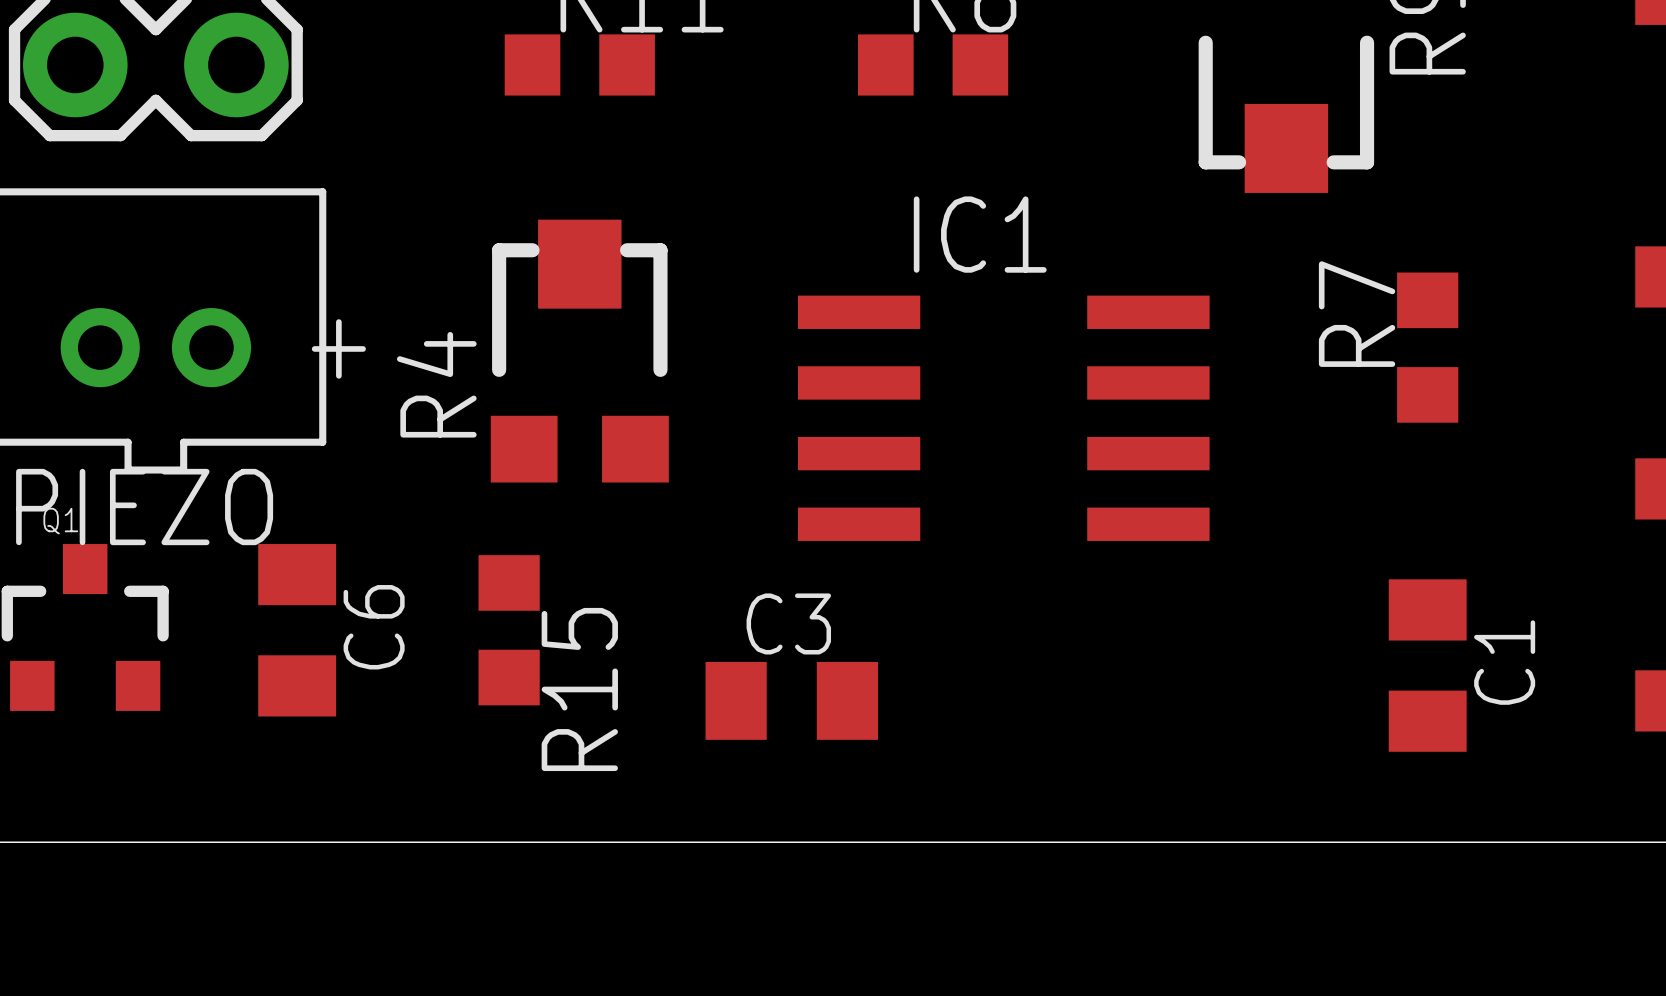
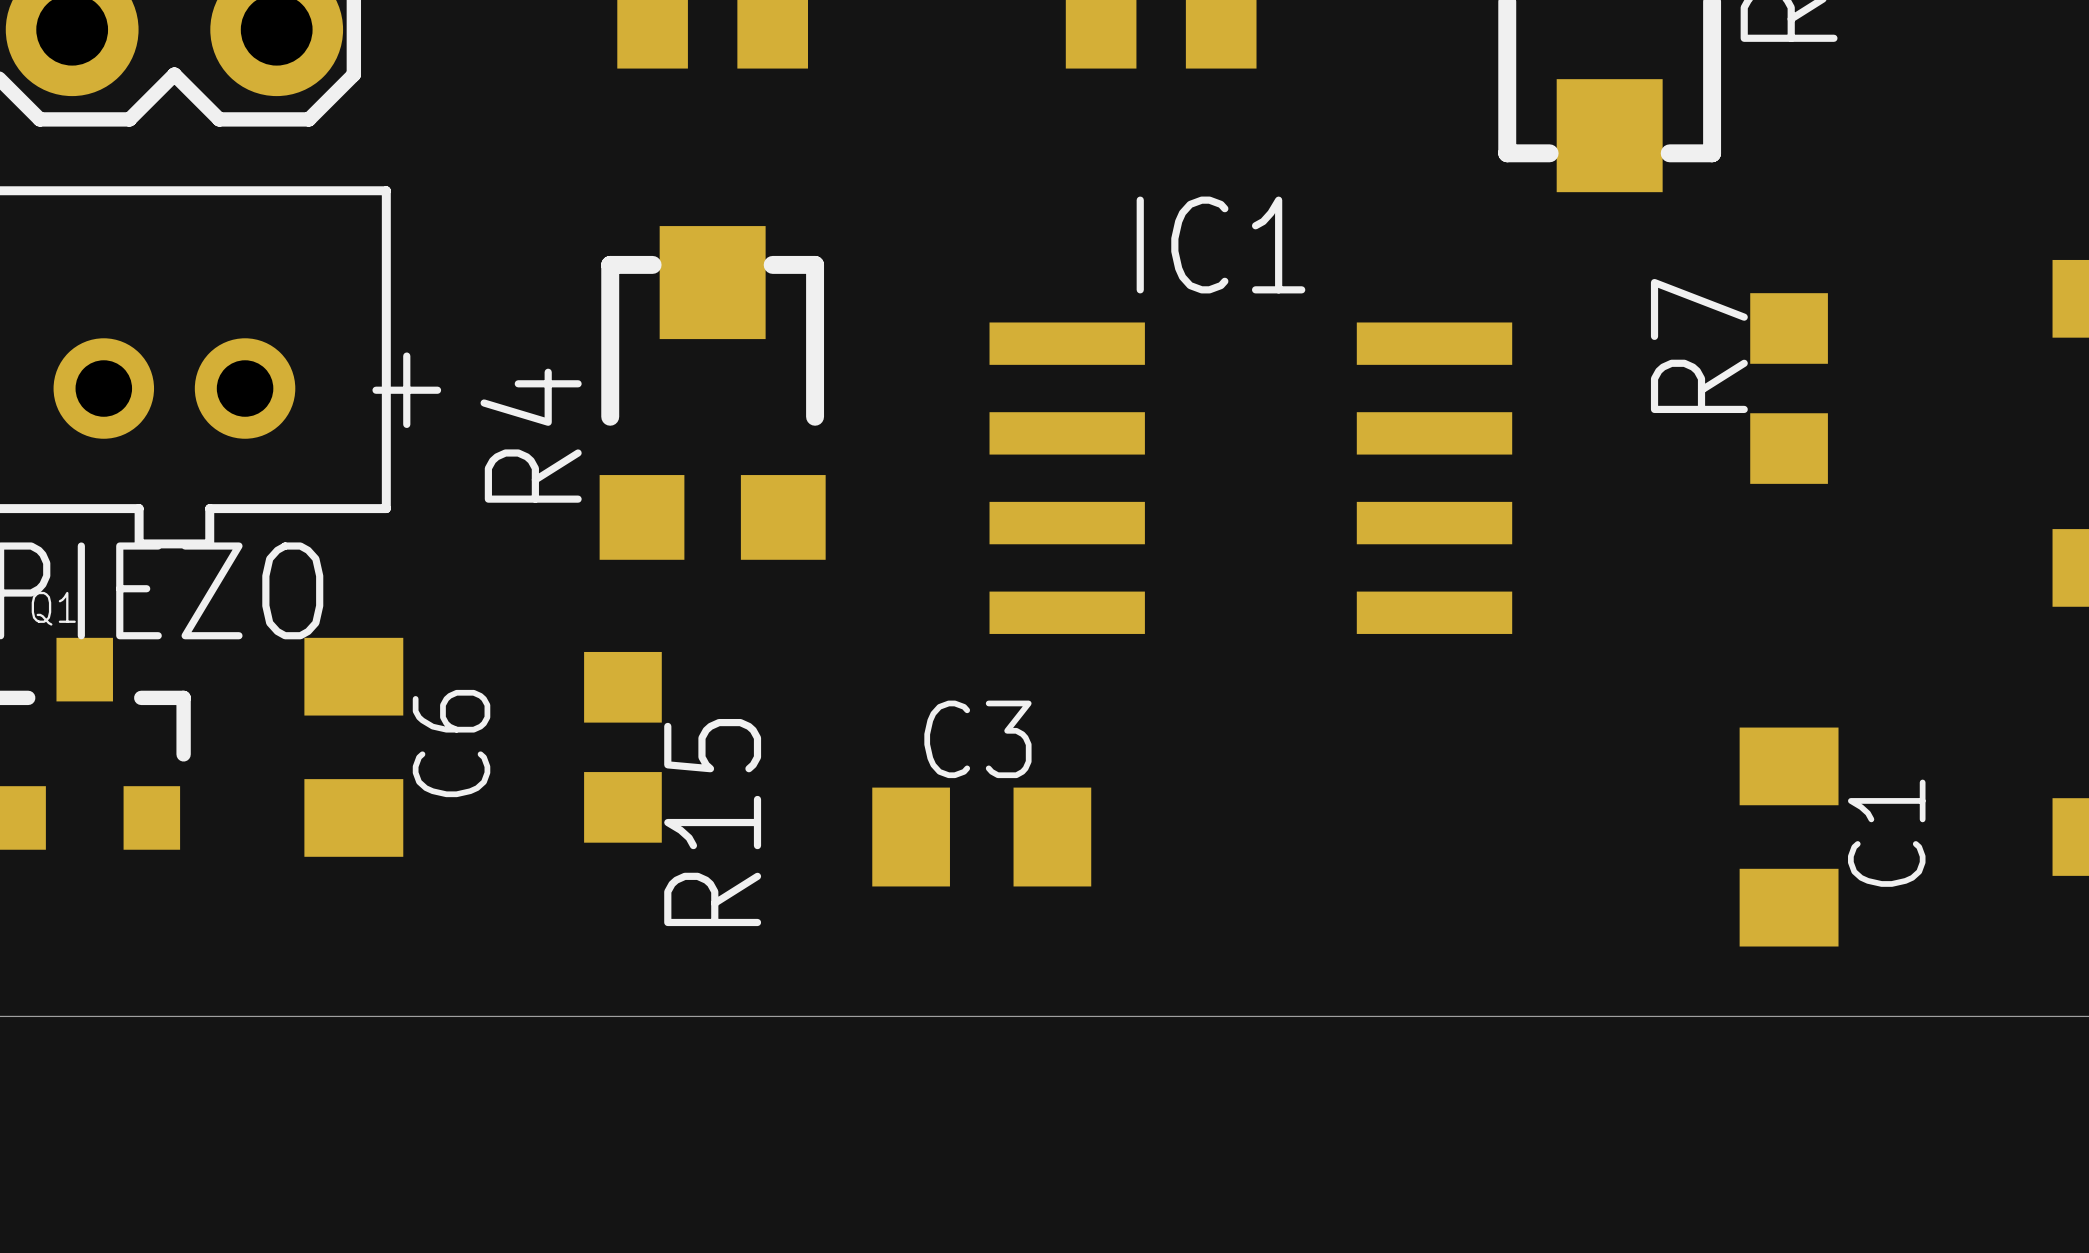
C1 position: (1427, 665) -> (1789, 837)

